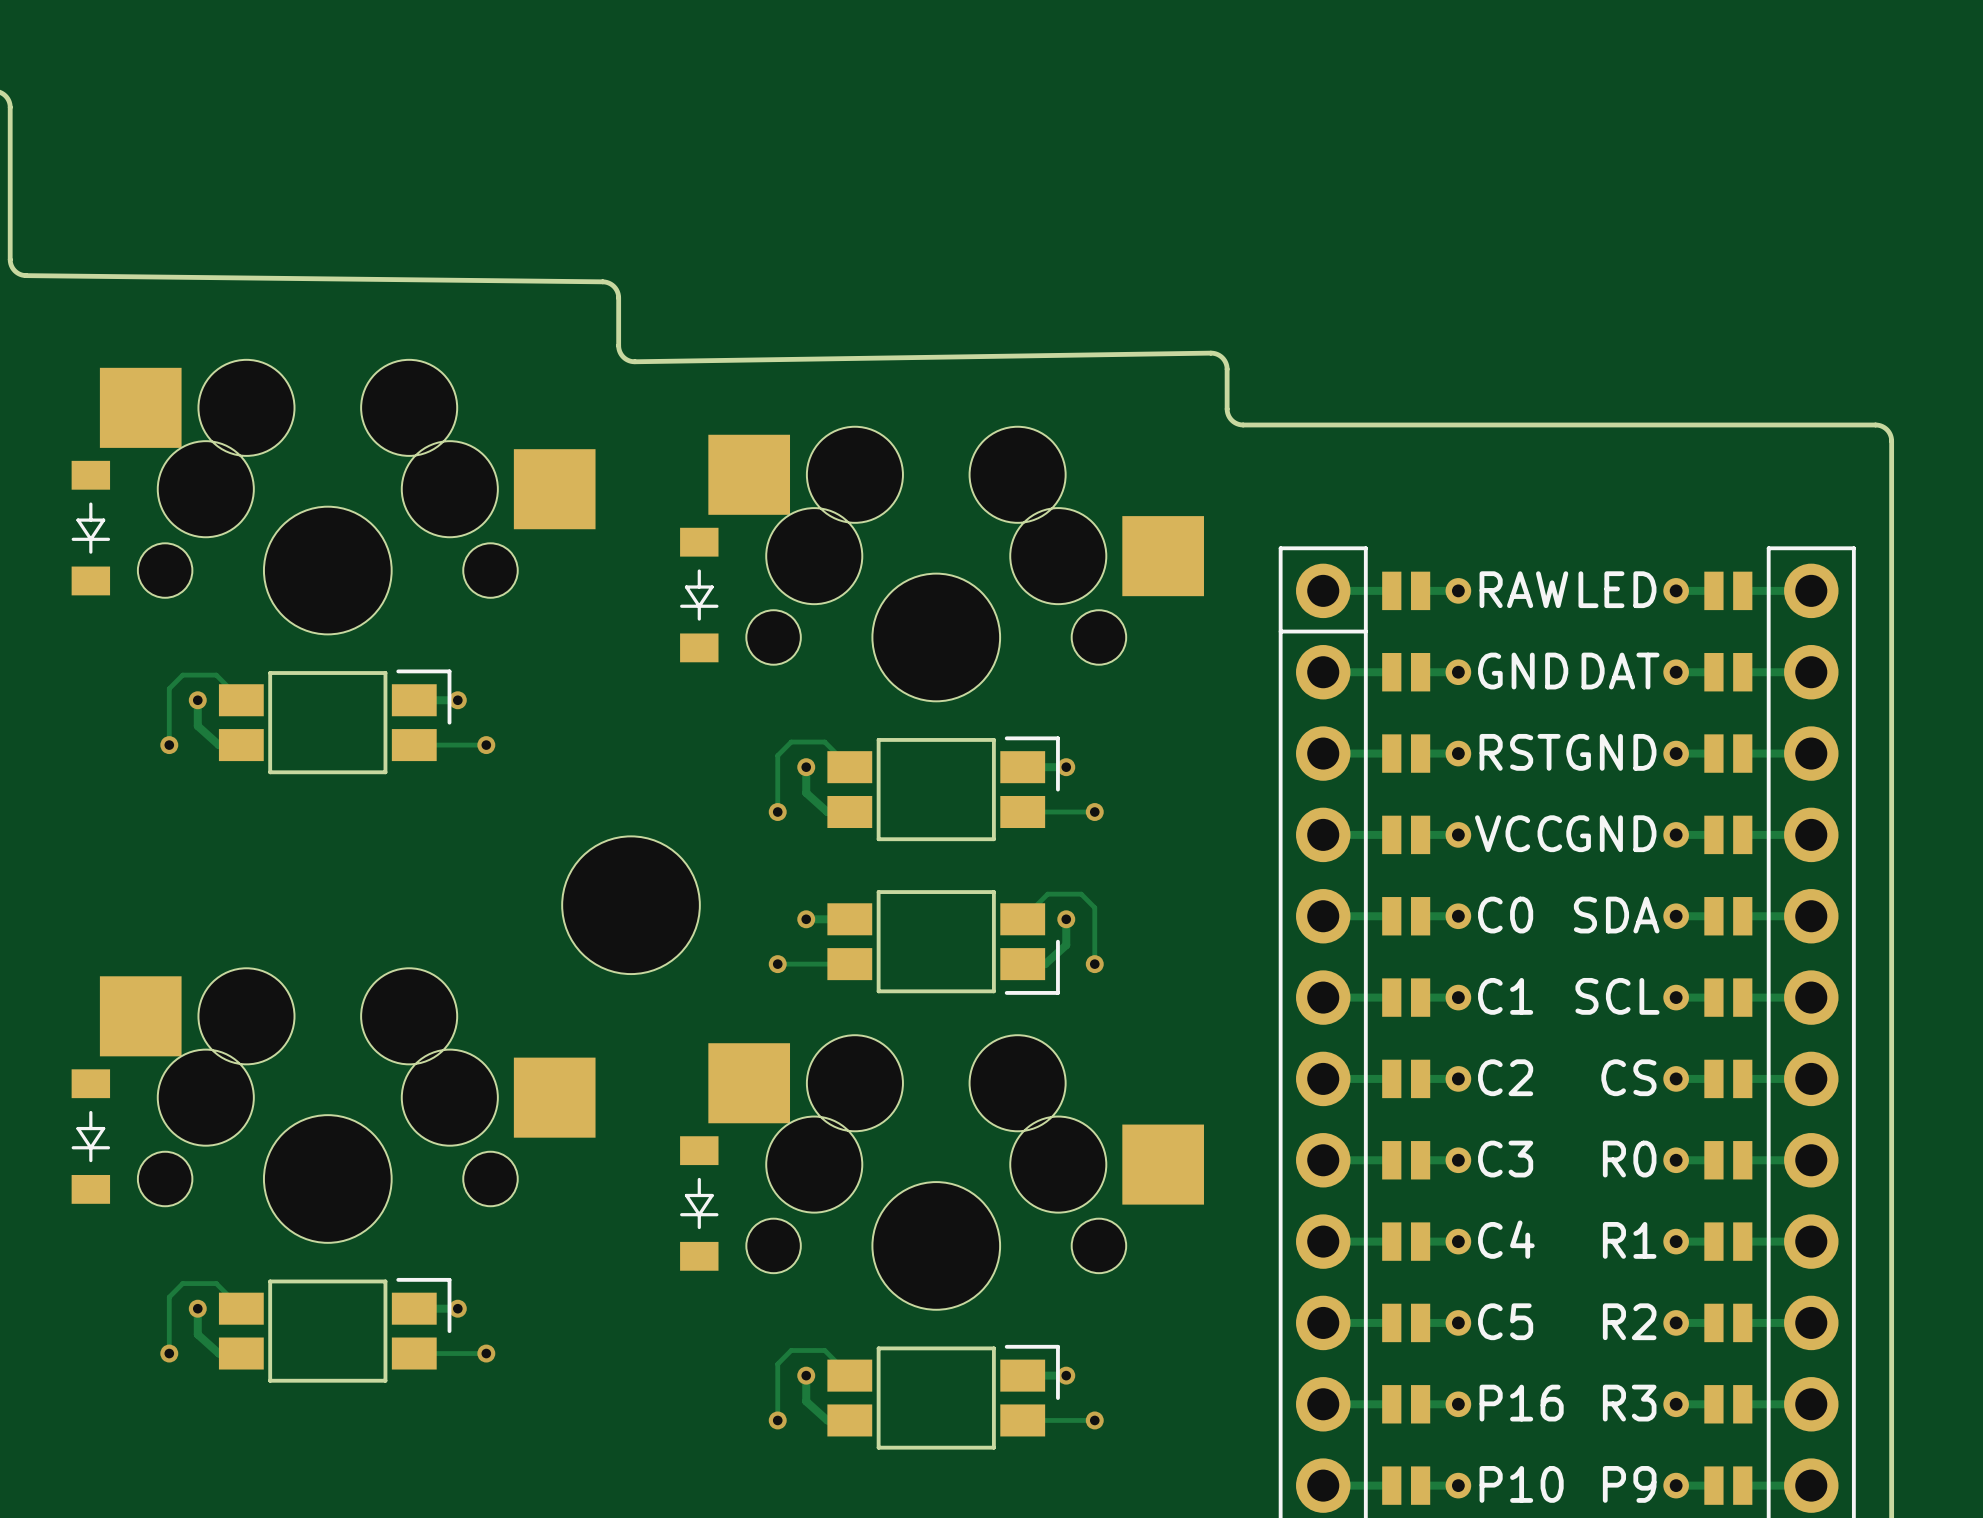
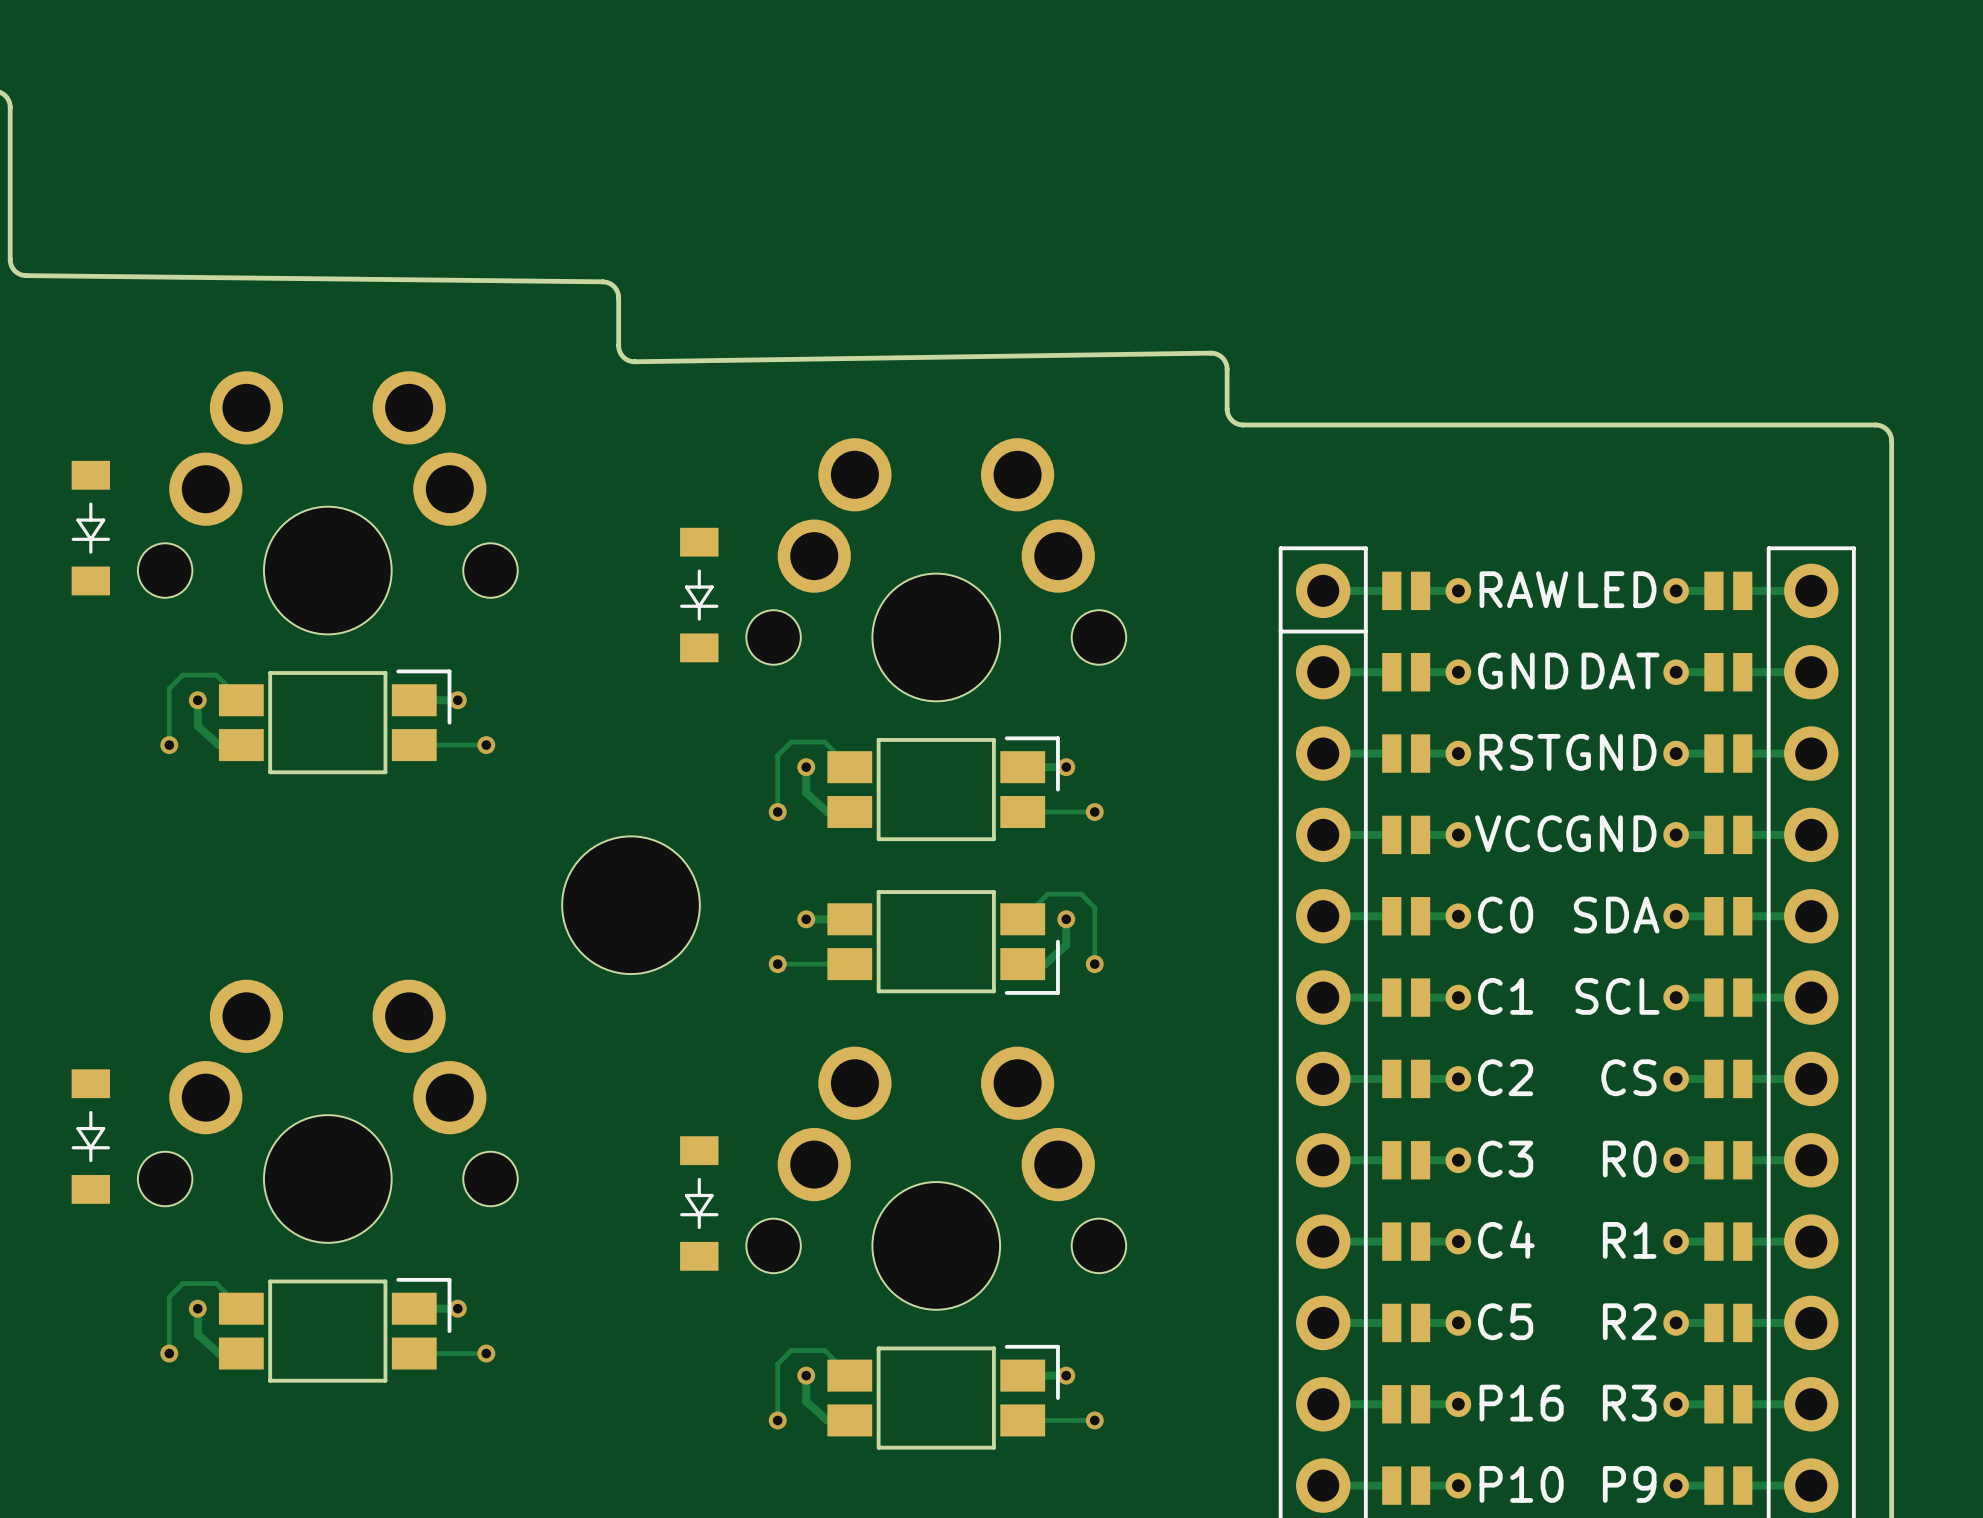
part footprint: [99, 359, 596, 635] -> [137, 371, 518, 635]
part footprint: [708, 426, 1204, 702] -> [746, 438, 1127, 702]
part footprint: [99, 968, 596, 1243] -> [137, 979, 518, 1243]
part footprint: [708, 1035, 1204, 1310] -> [746, 1046, 1127, 1310]

